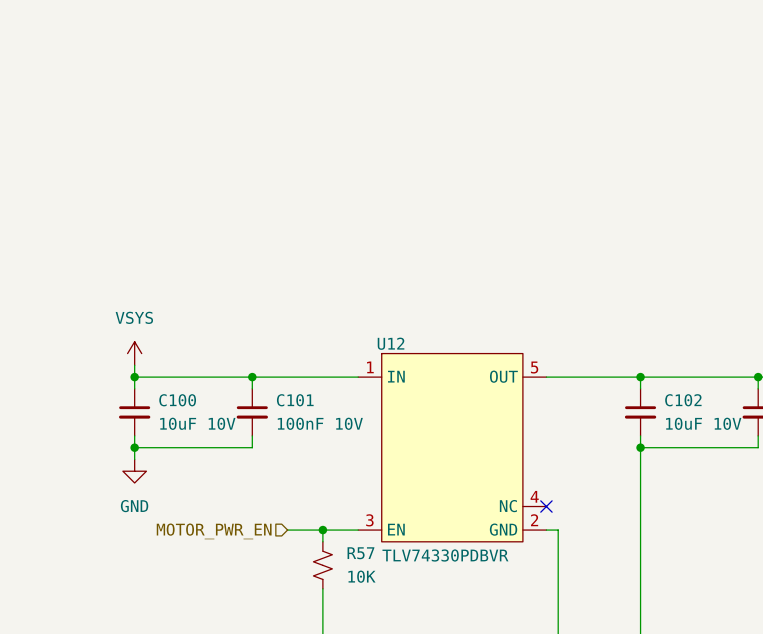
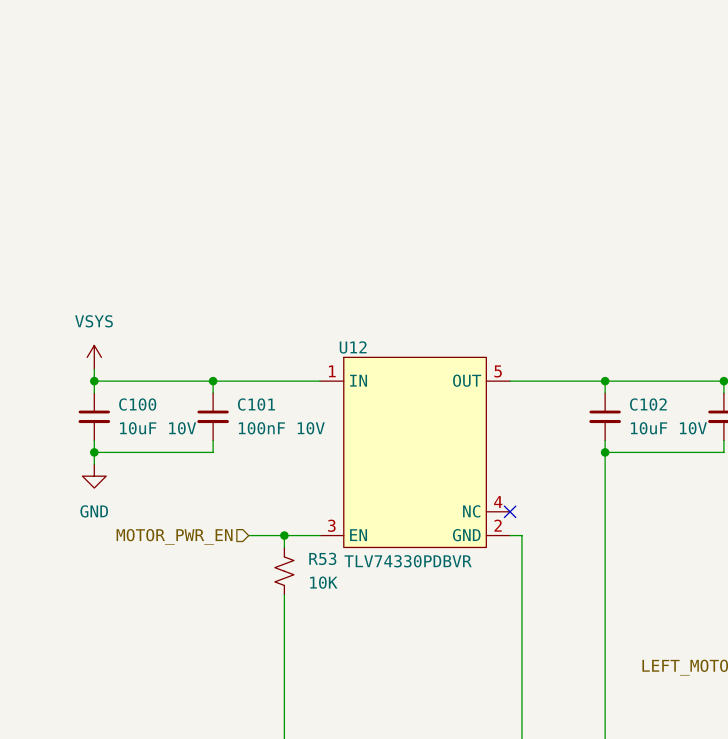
R57 name: R57 (360, 553) -> R53 (322, 558)

